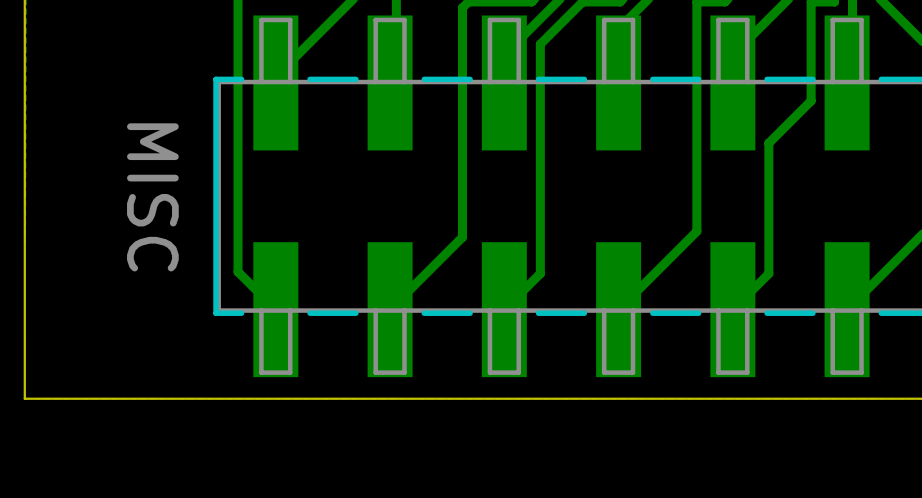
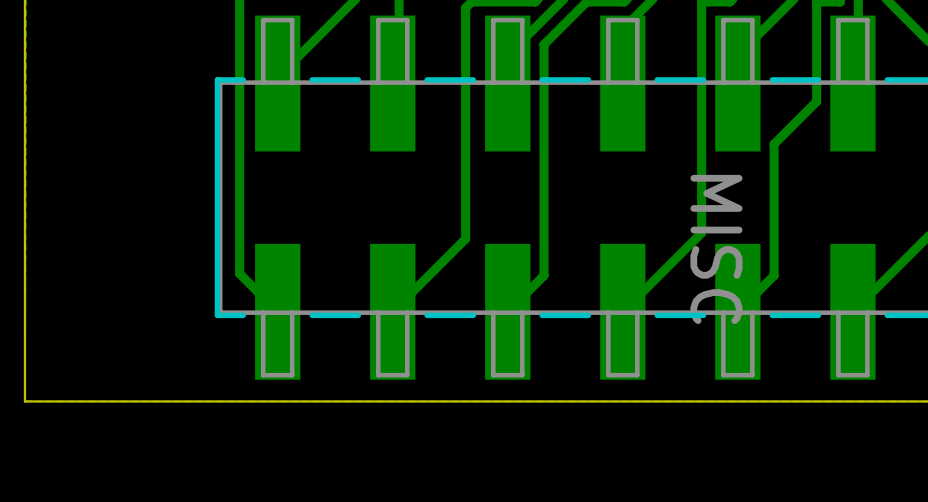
part value position: MISC (152, 197) -> MISC (716, 249)

